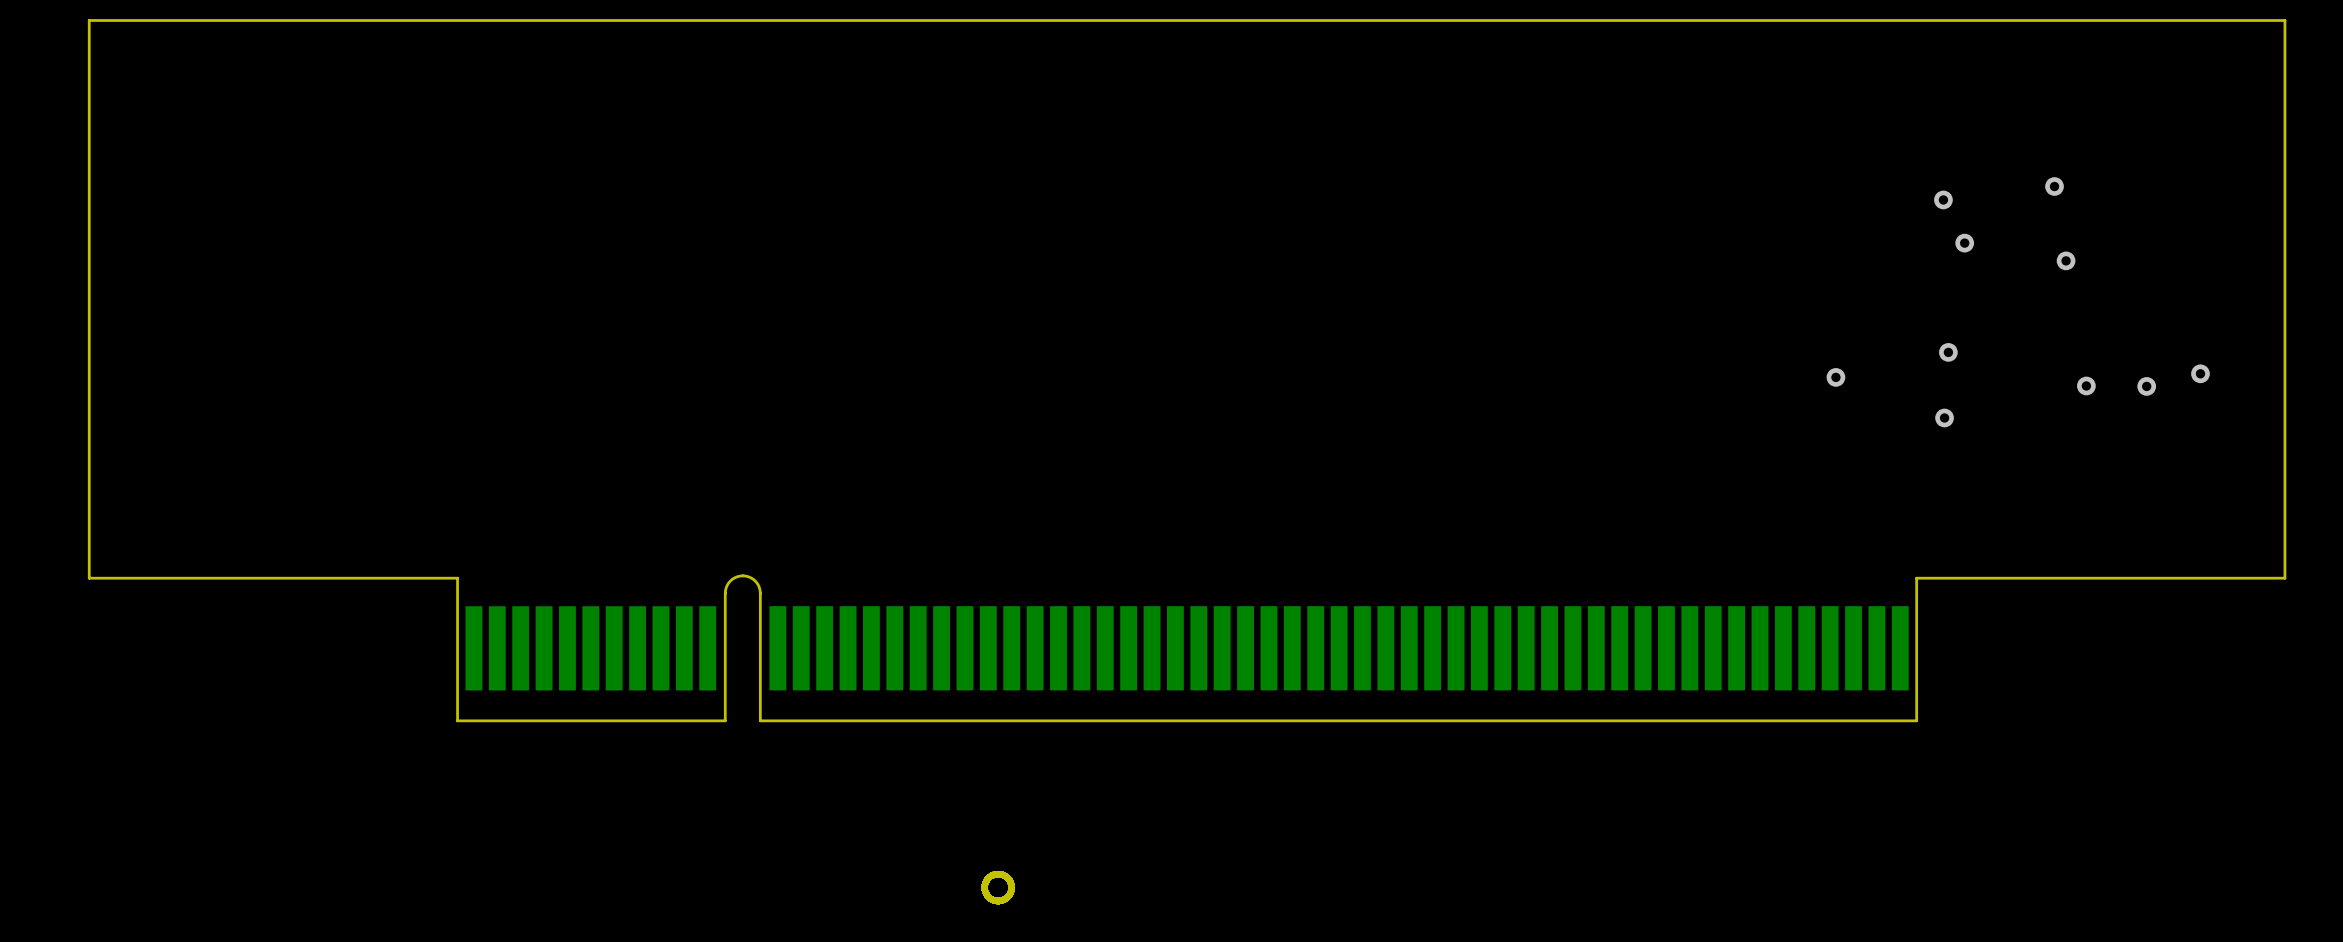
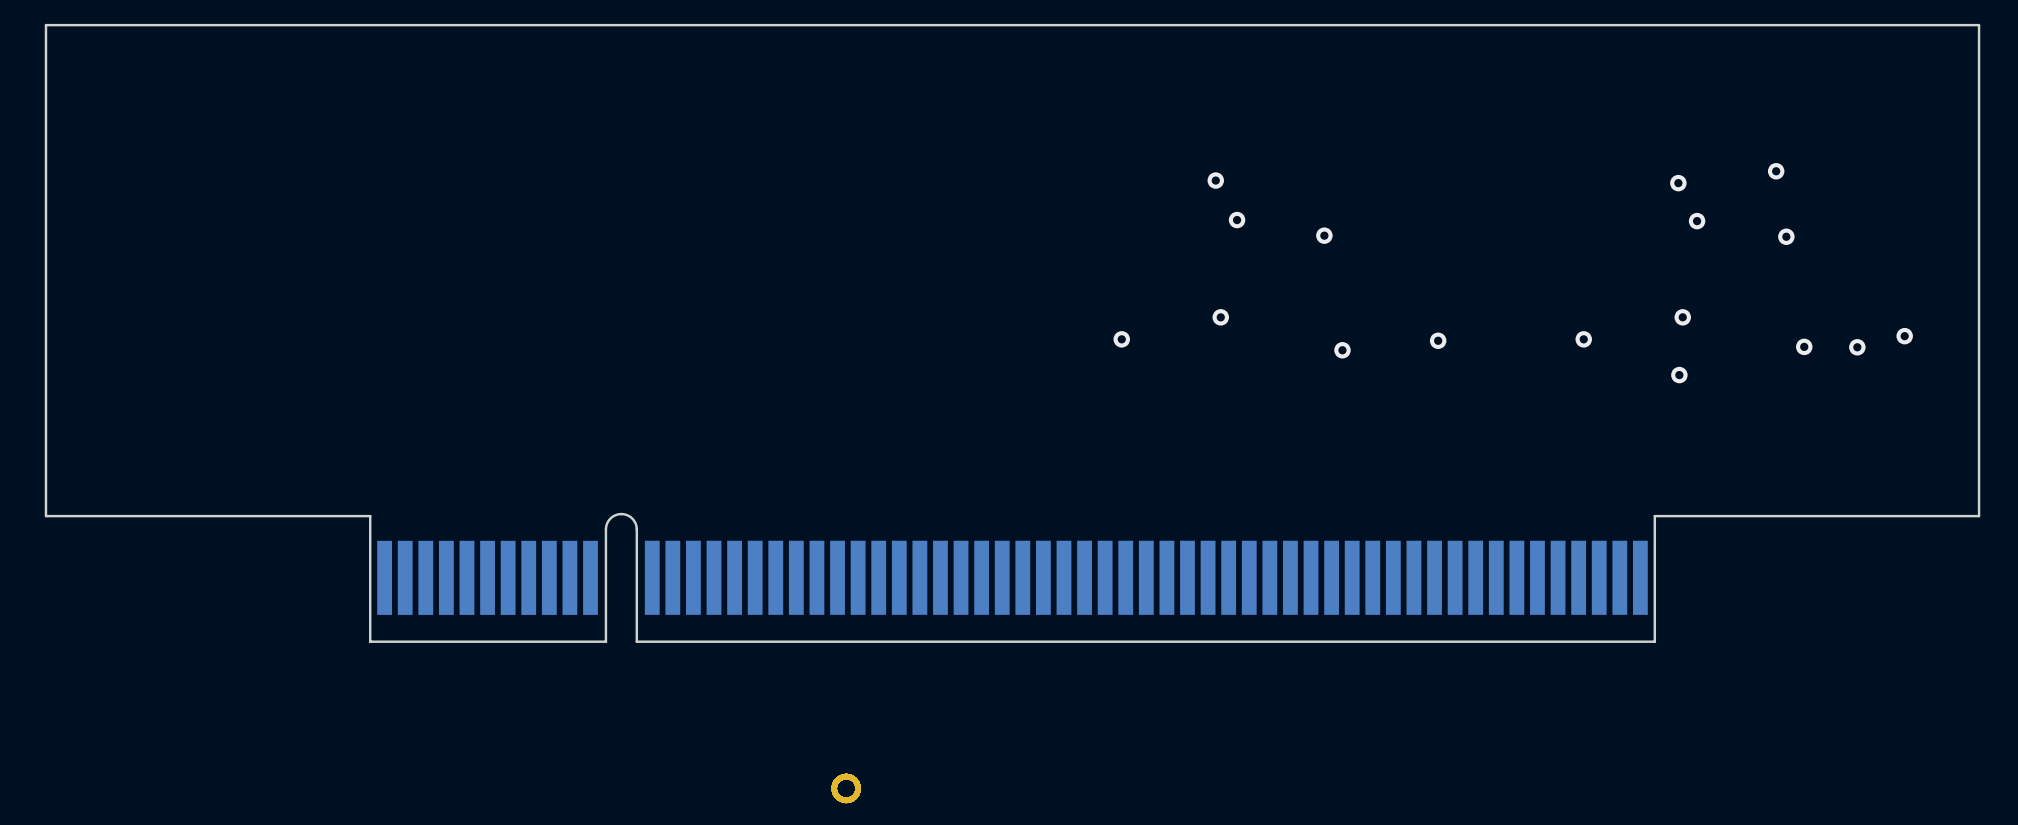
via: none -> (1215, 180)
via: none -> (1237, 220)
via: none -> (1324, 235)
via: none -> (1220, 317)
via: none -> (1121, 339)
via: none -> (1438, 340)
via: none -> (1342, 350)

